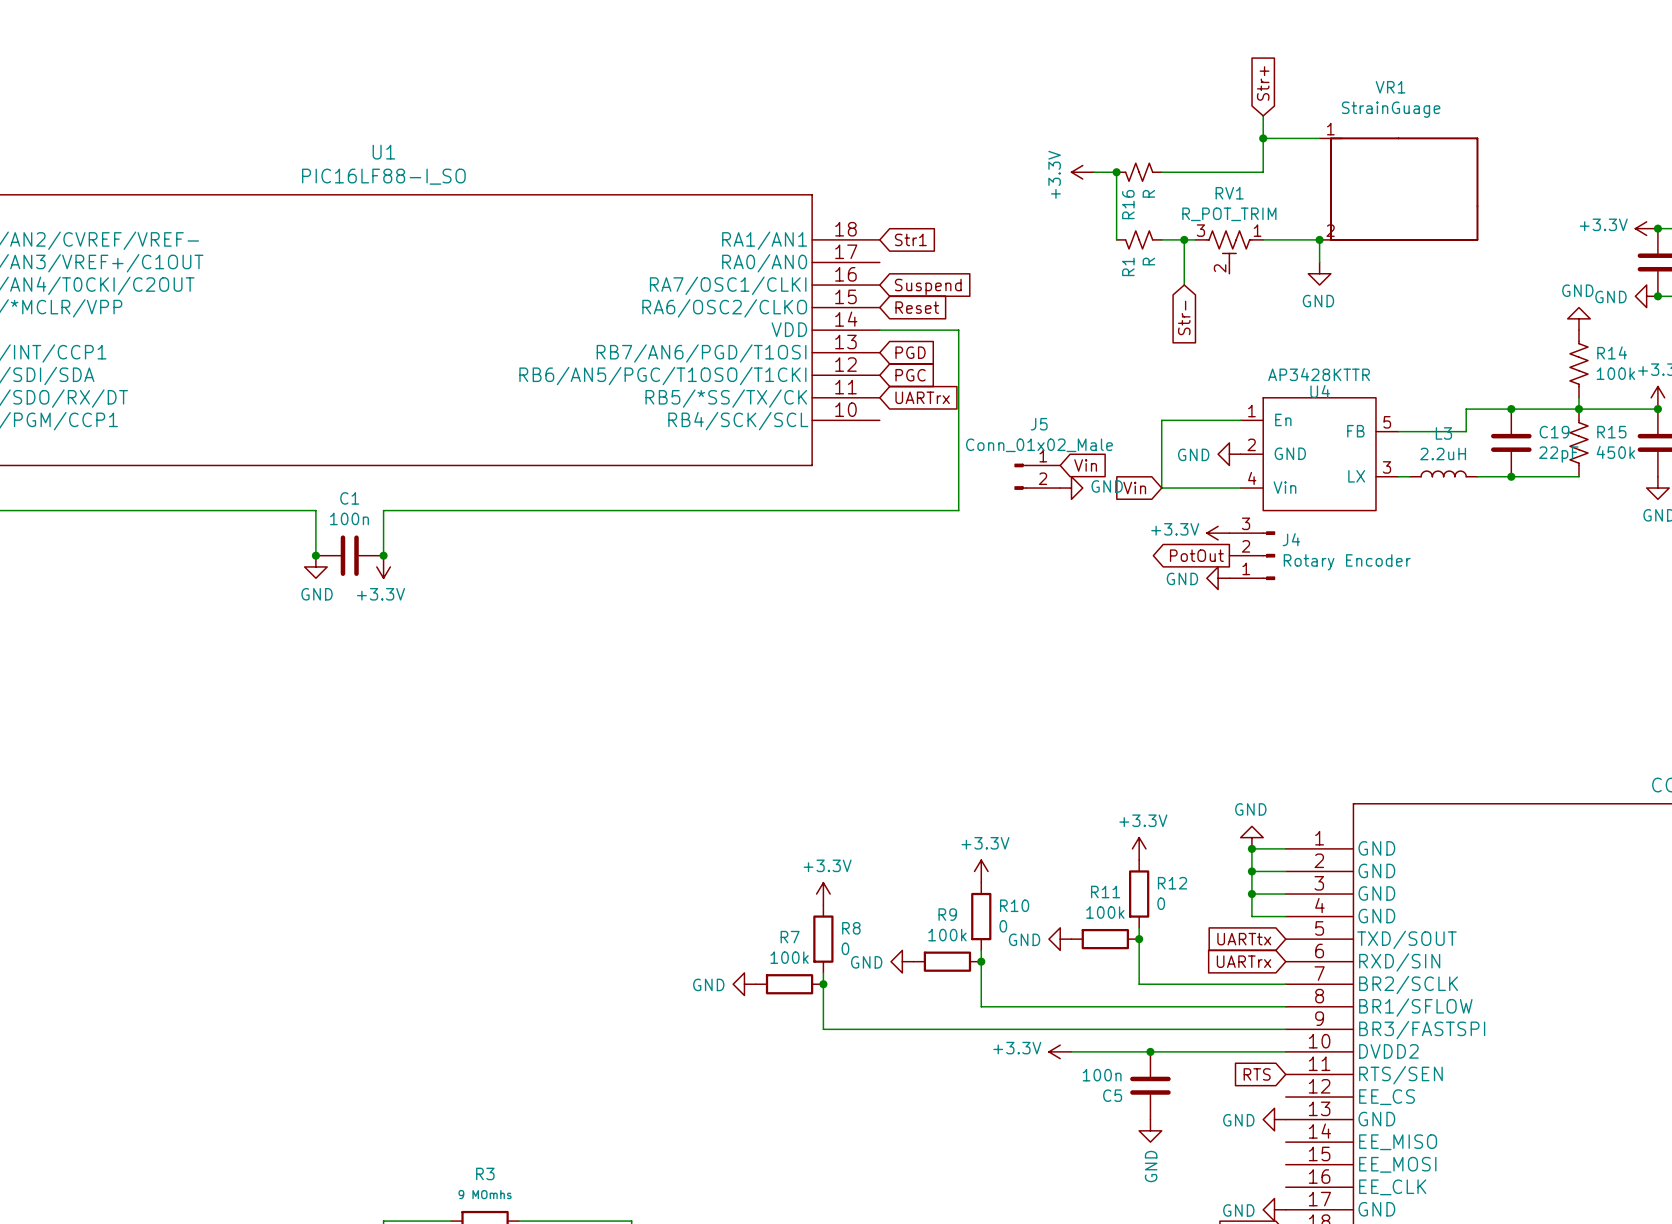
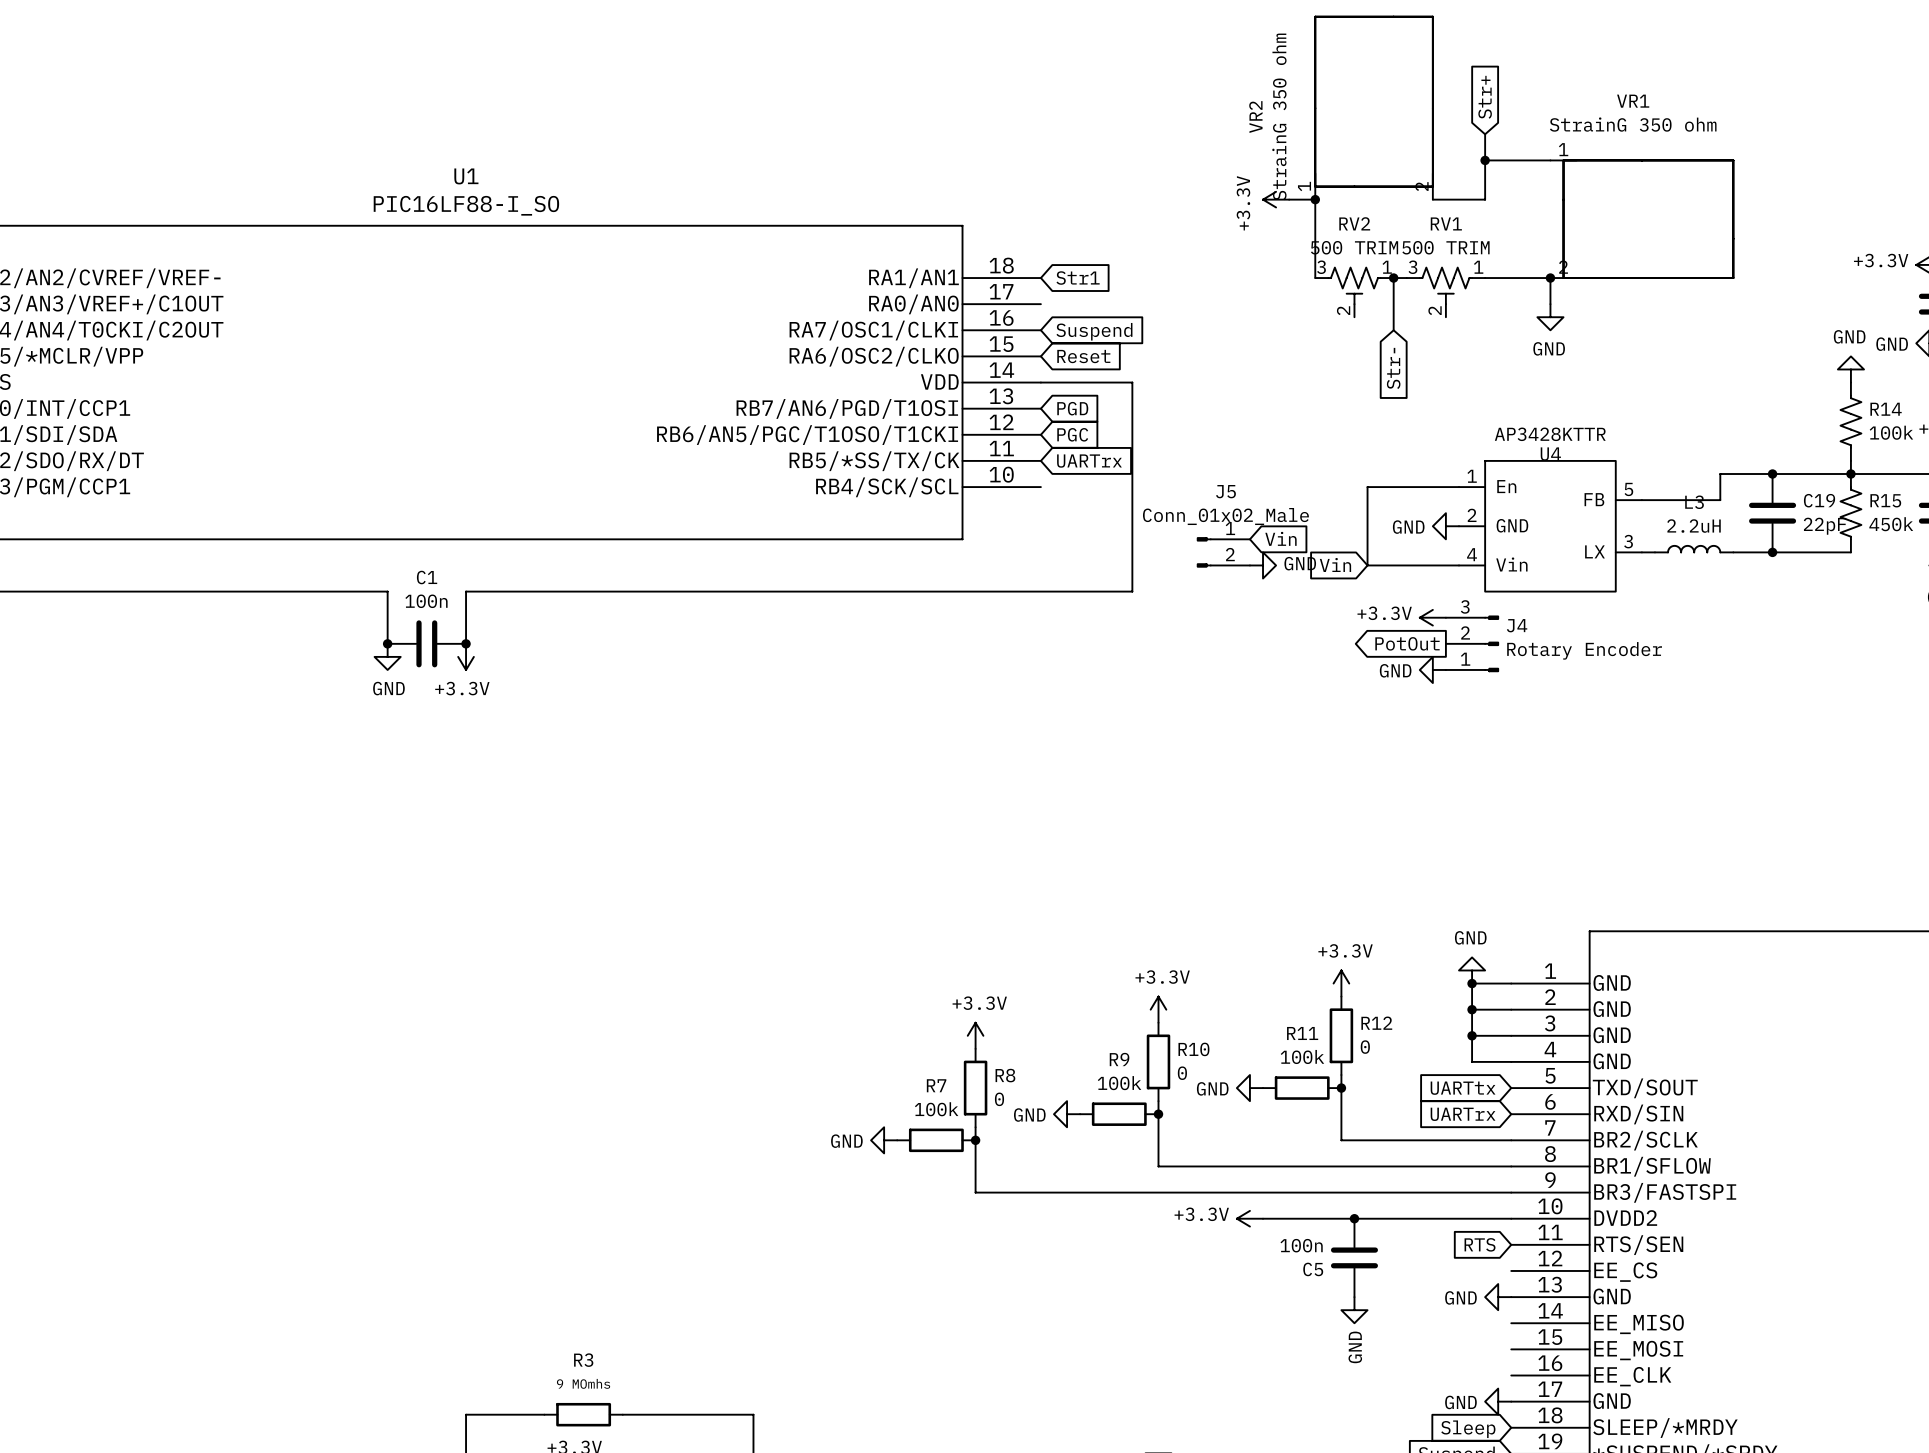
VR2: none -> StrainG 350 ohm (1374, 108)
VR1 value: StrainGuage (1391, 109) -> StrainG 350 ohm (1633, 124)
R16: R (1139, 172) -> none
wire: (1161, 172) (1218, 172) -> none
RV1 value: R_POT_TRIM (1229, 214) -> 500 TRIM (1445, 247)
R1: R (1139, 239) -> none
RV2: none -> 500 TRIM (1354, 292)

